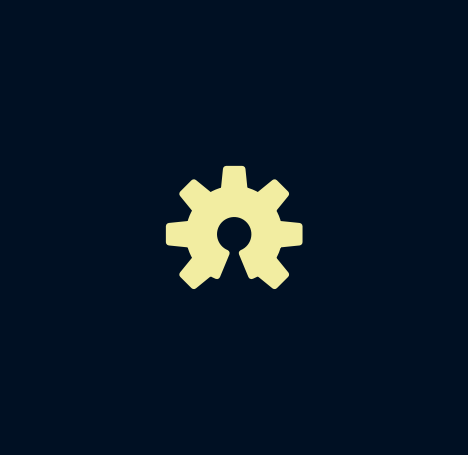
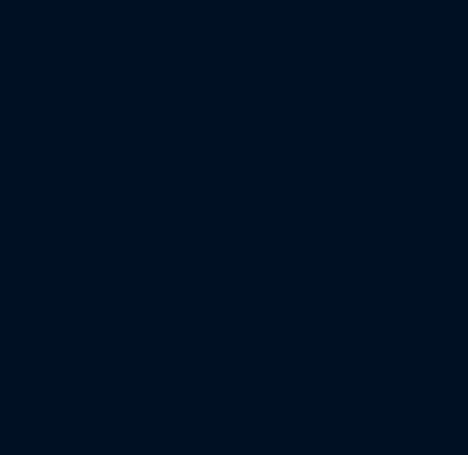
drawing: [165, 165, 303, 290] -> none

